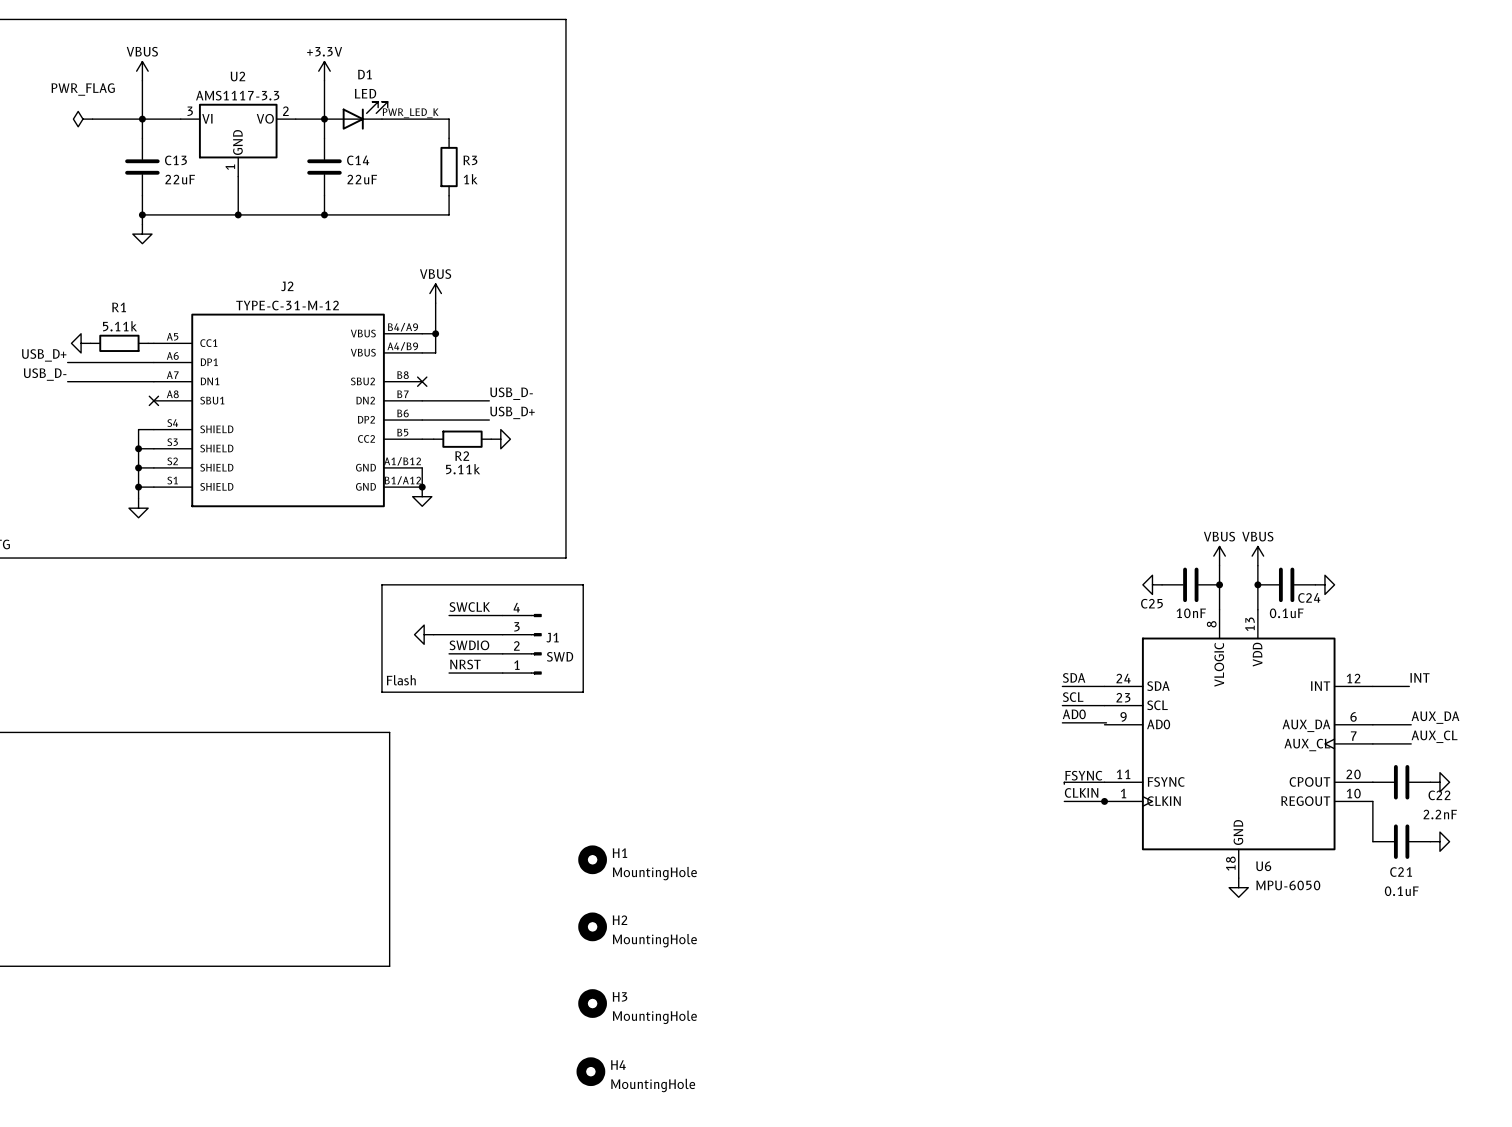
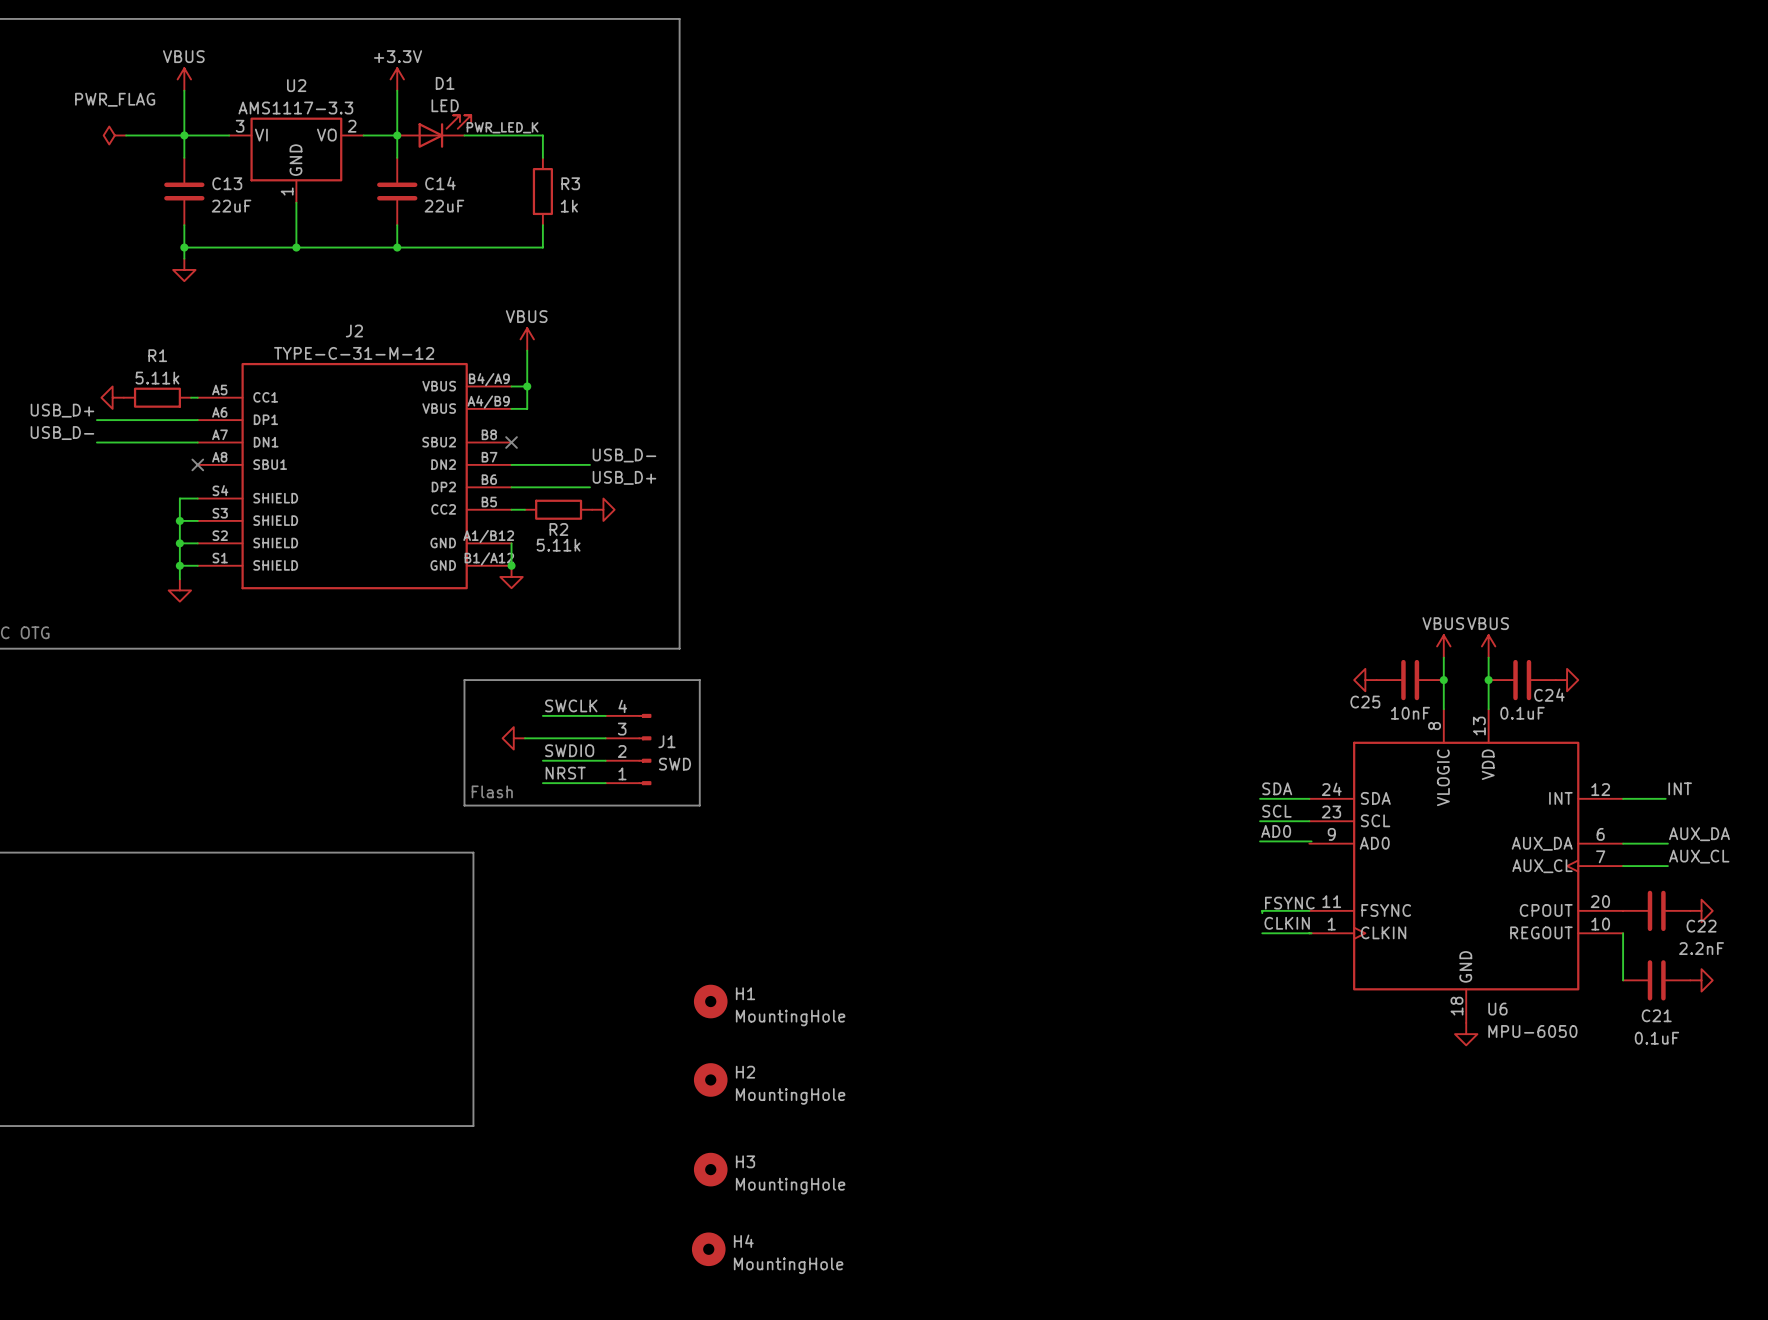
junction: (1104, 801) -> none

